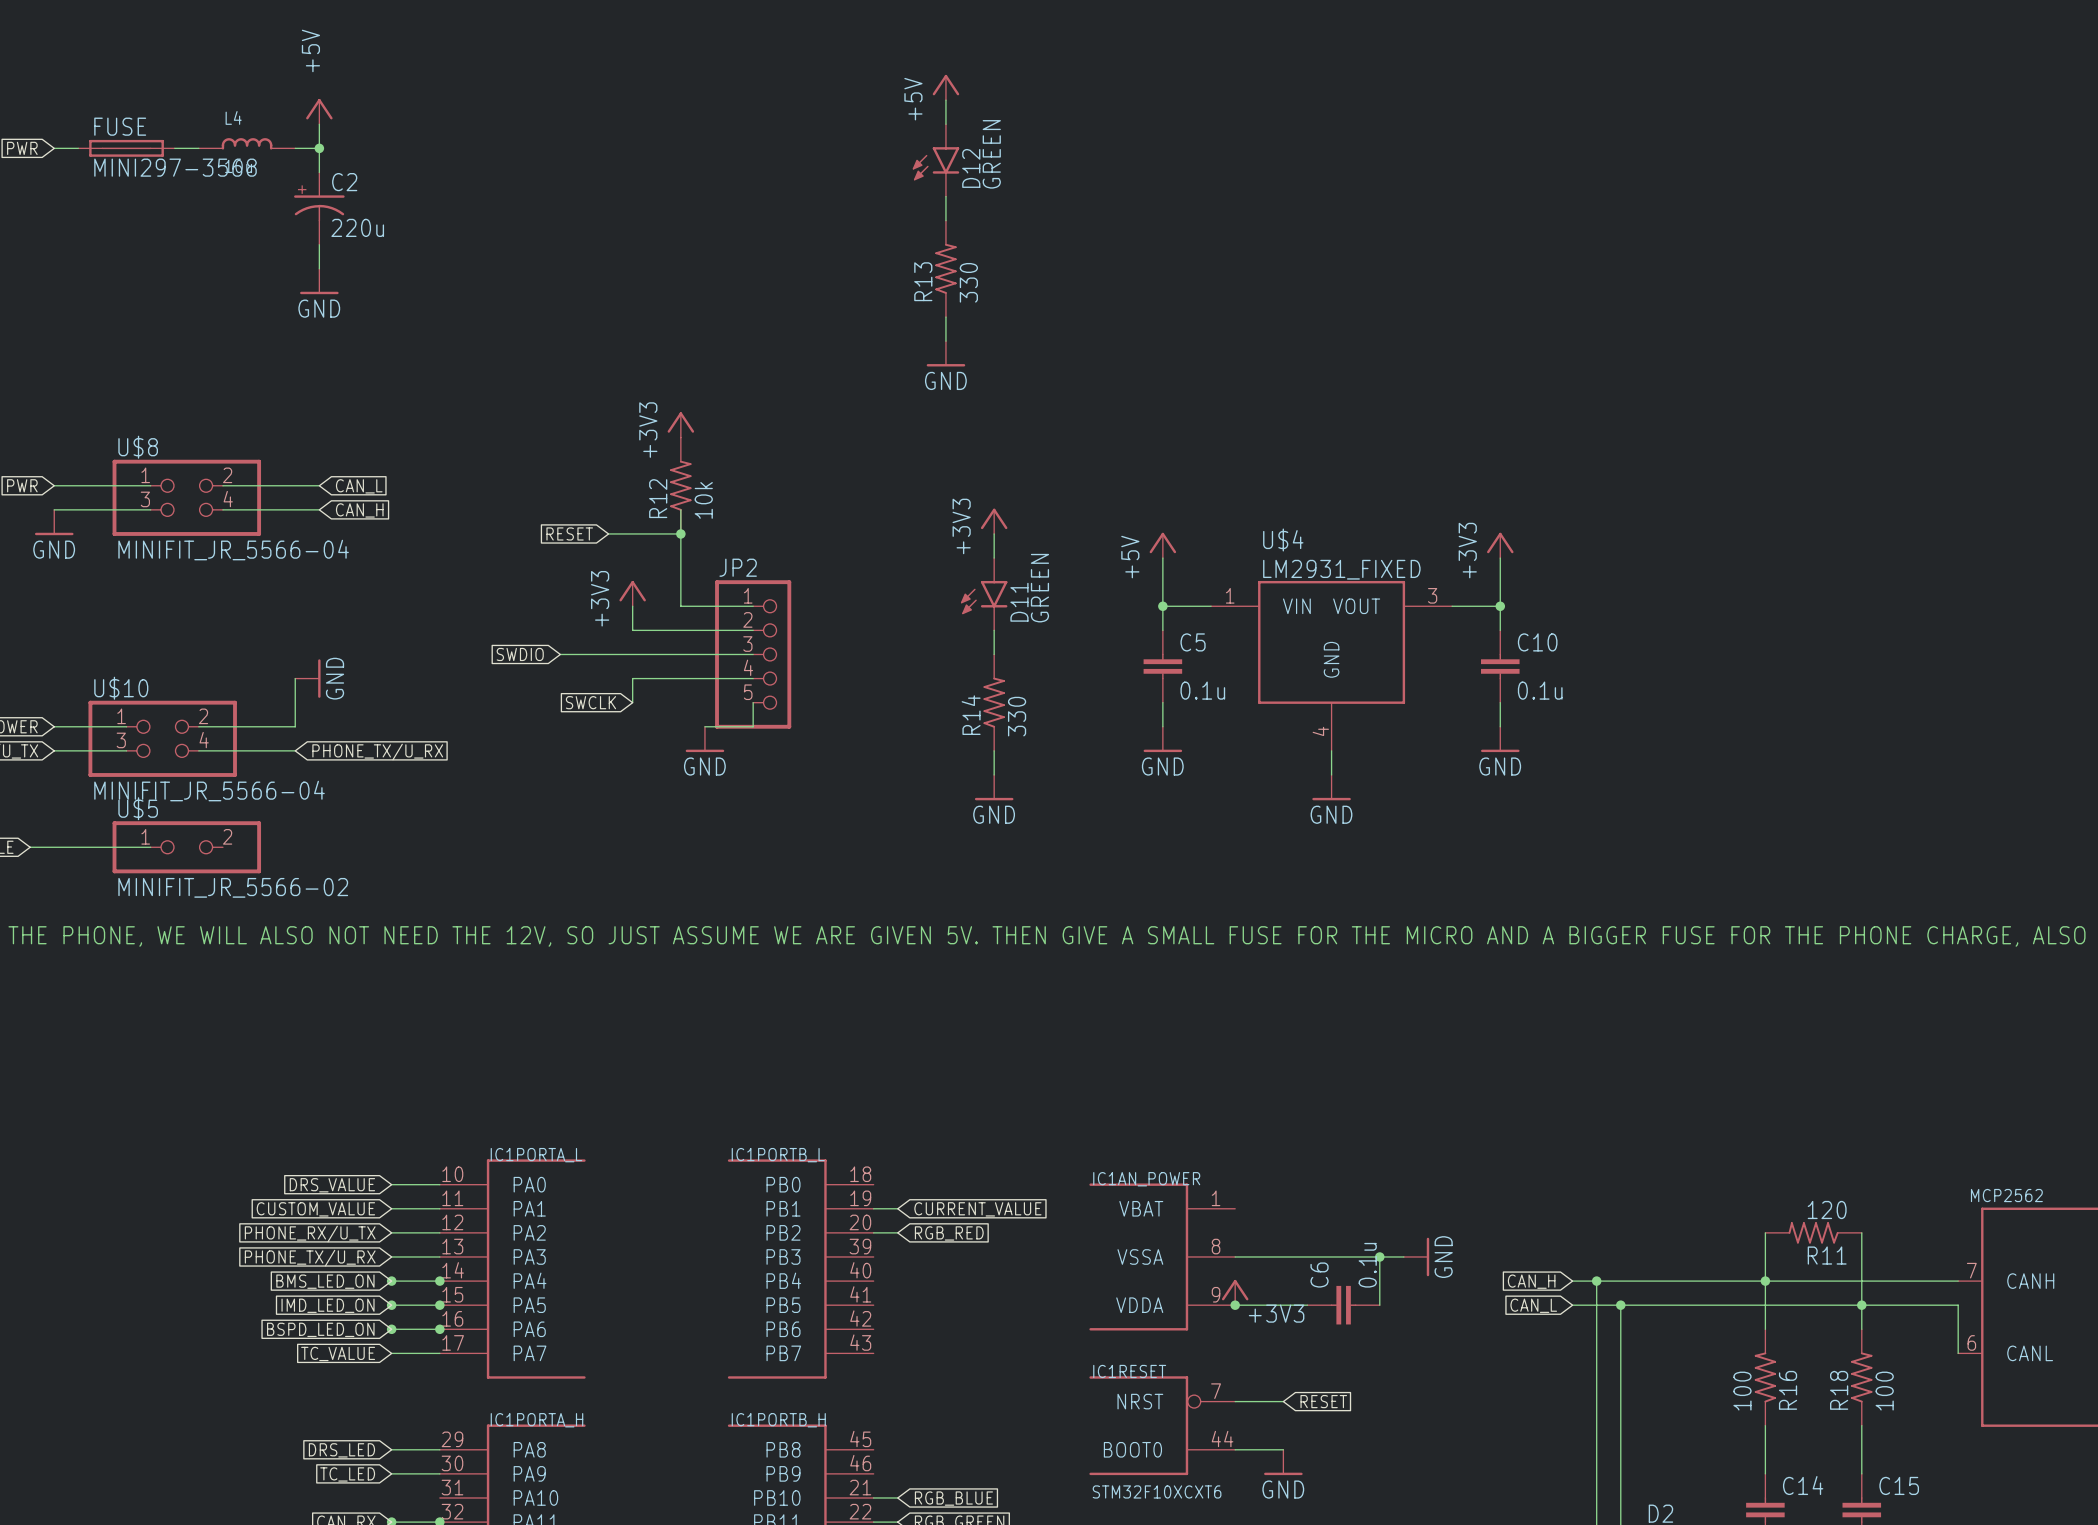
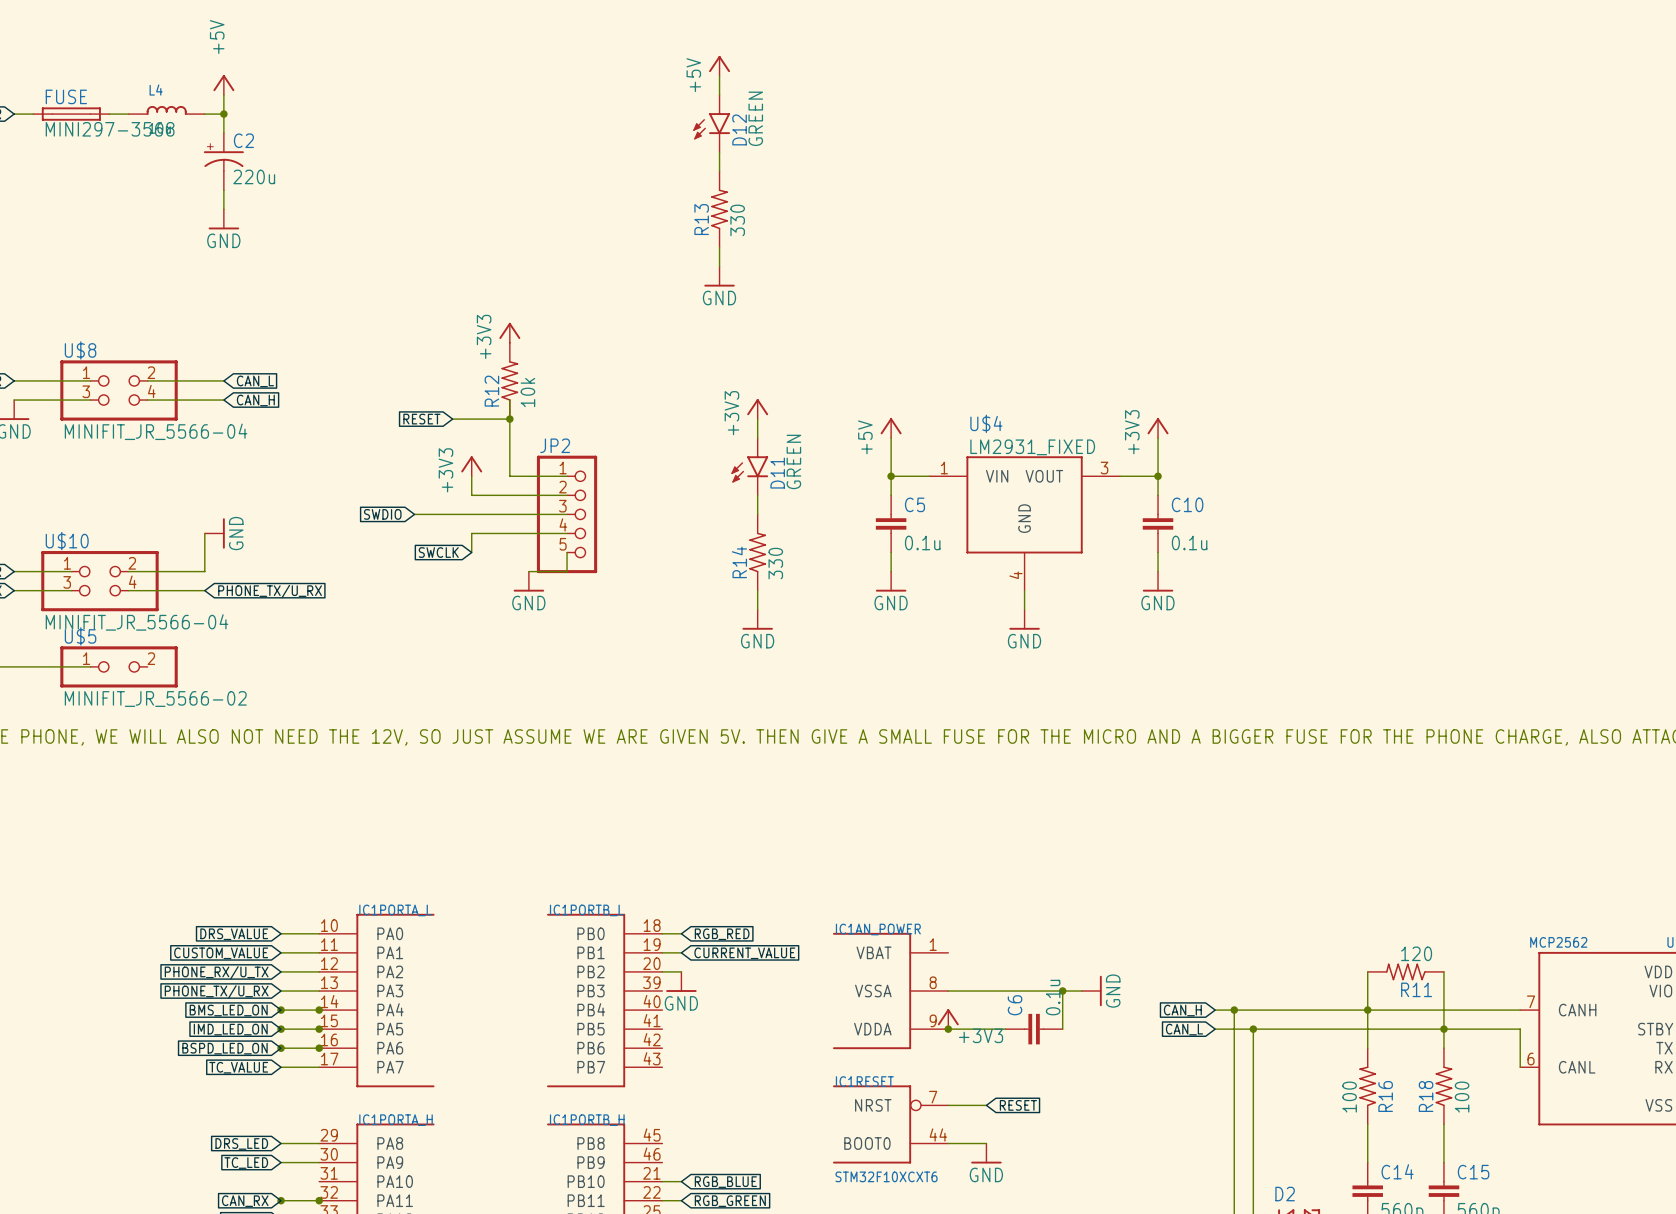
wire: none -> (662, 933) (681, 933)
global label position: RGB_RED (949, 1233) -> RGB_RED (722, 934)
power symbol: none -> GND (681, 981)

